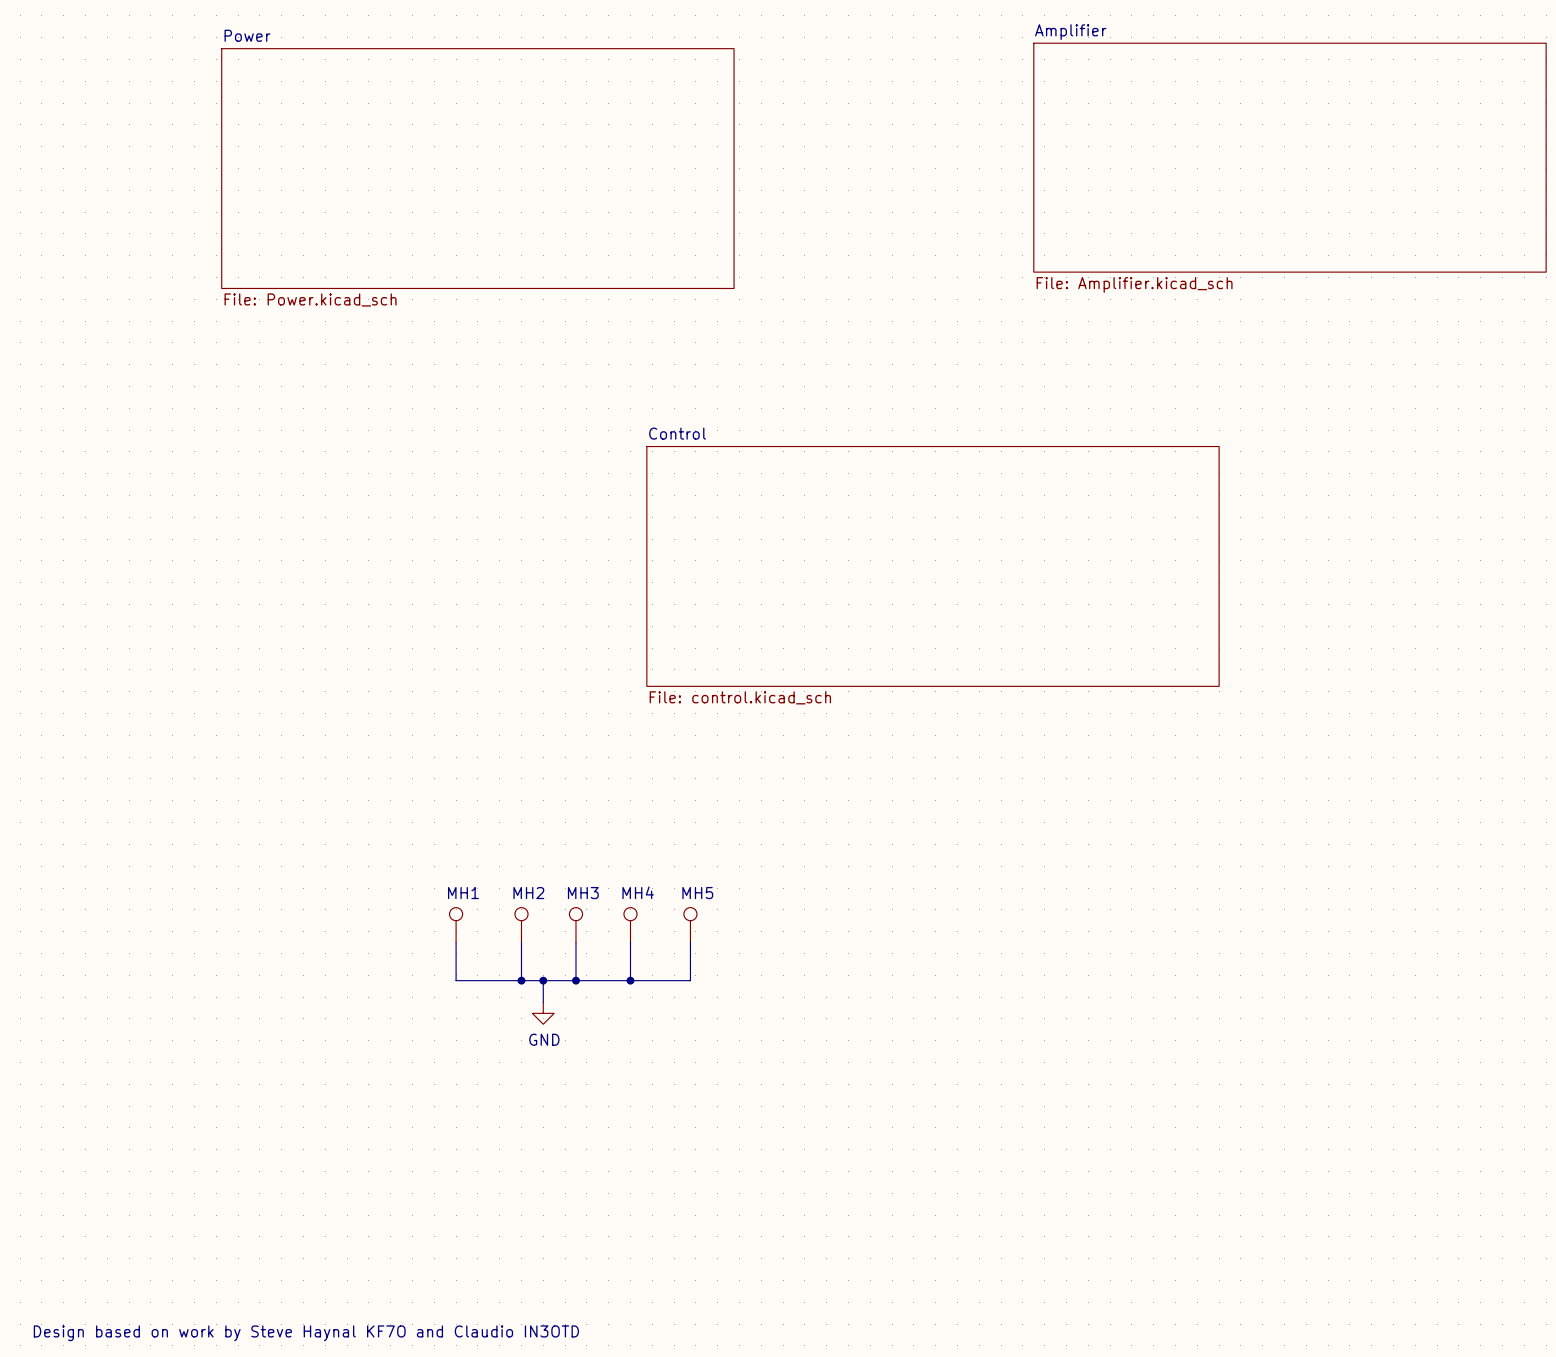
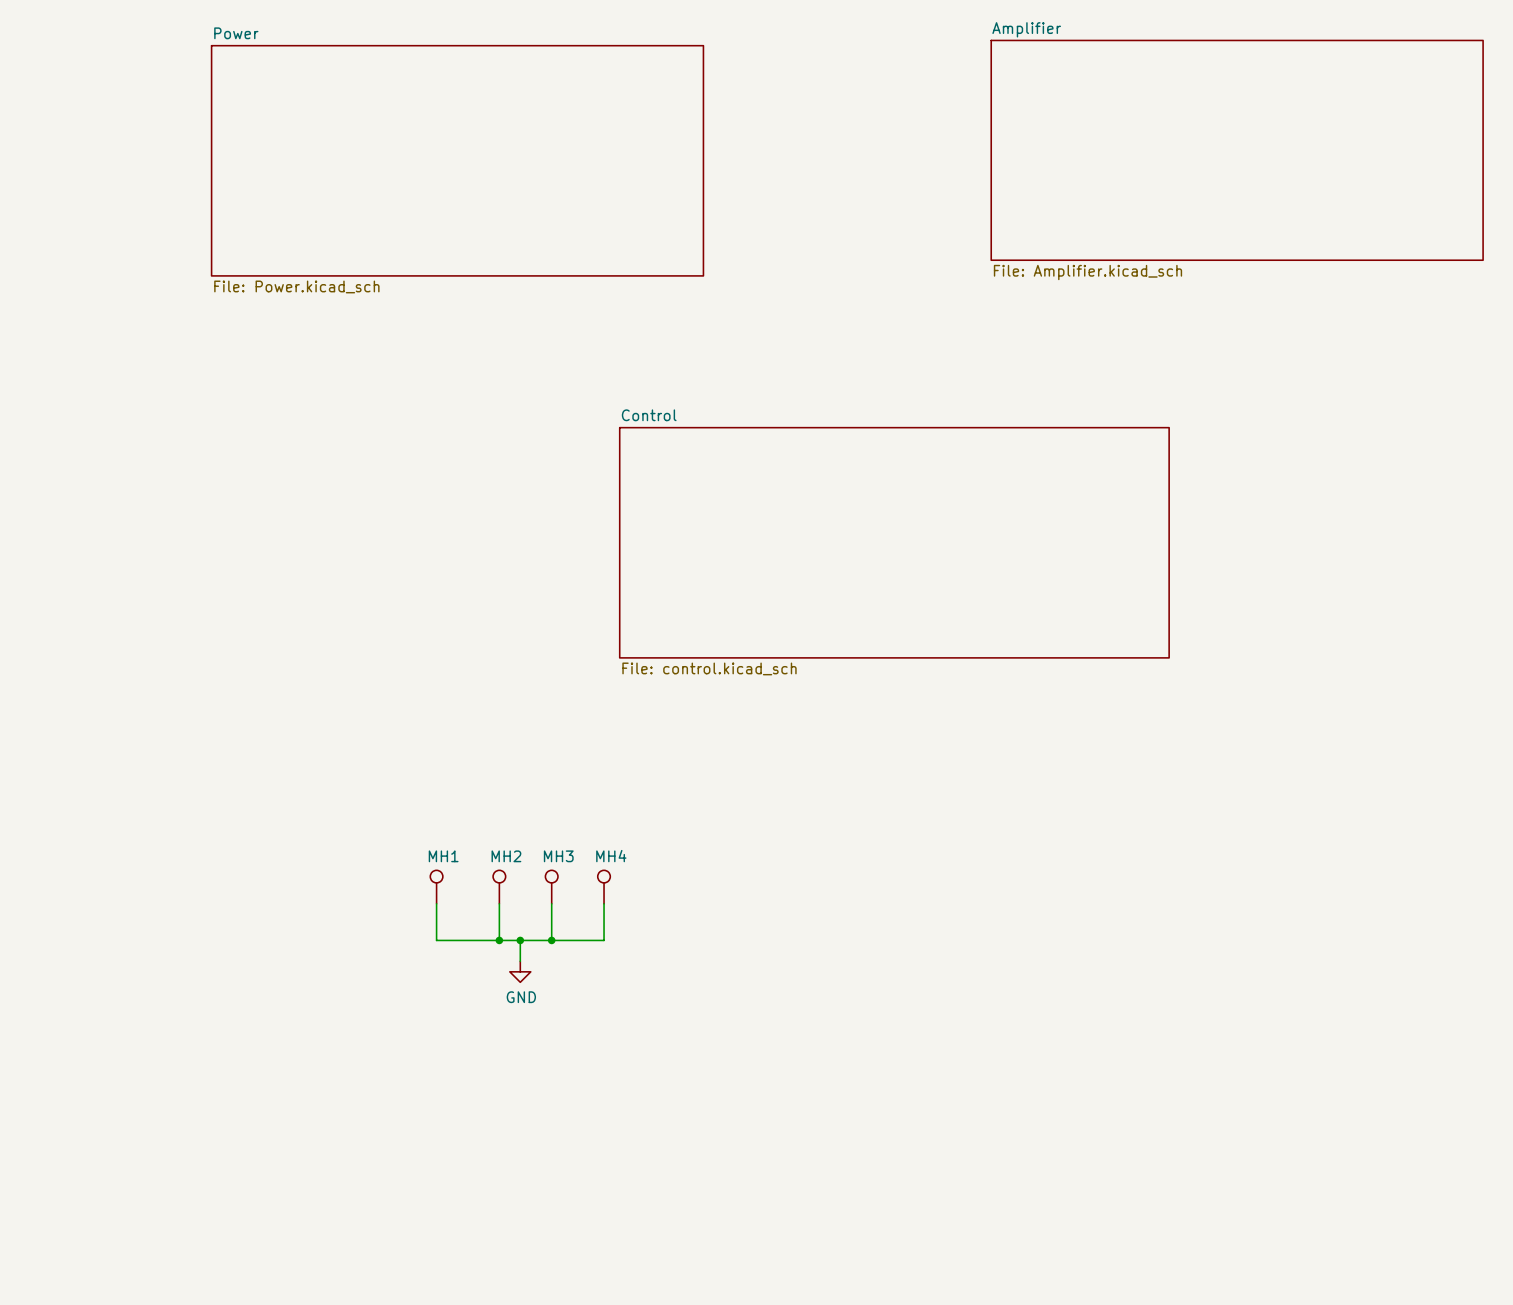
MH5: (690, 925) -> none
wire: (690, 942) (690, 980) (630, 980) -> none
junction: (630, 980) -> none
text: Design based on work by Steve Haynal KF7O and Claudio IN3OTD (306, 1333) -> none

